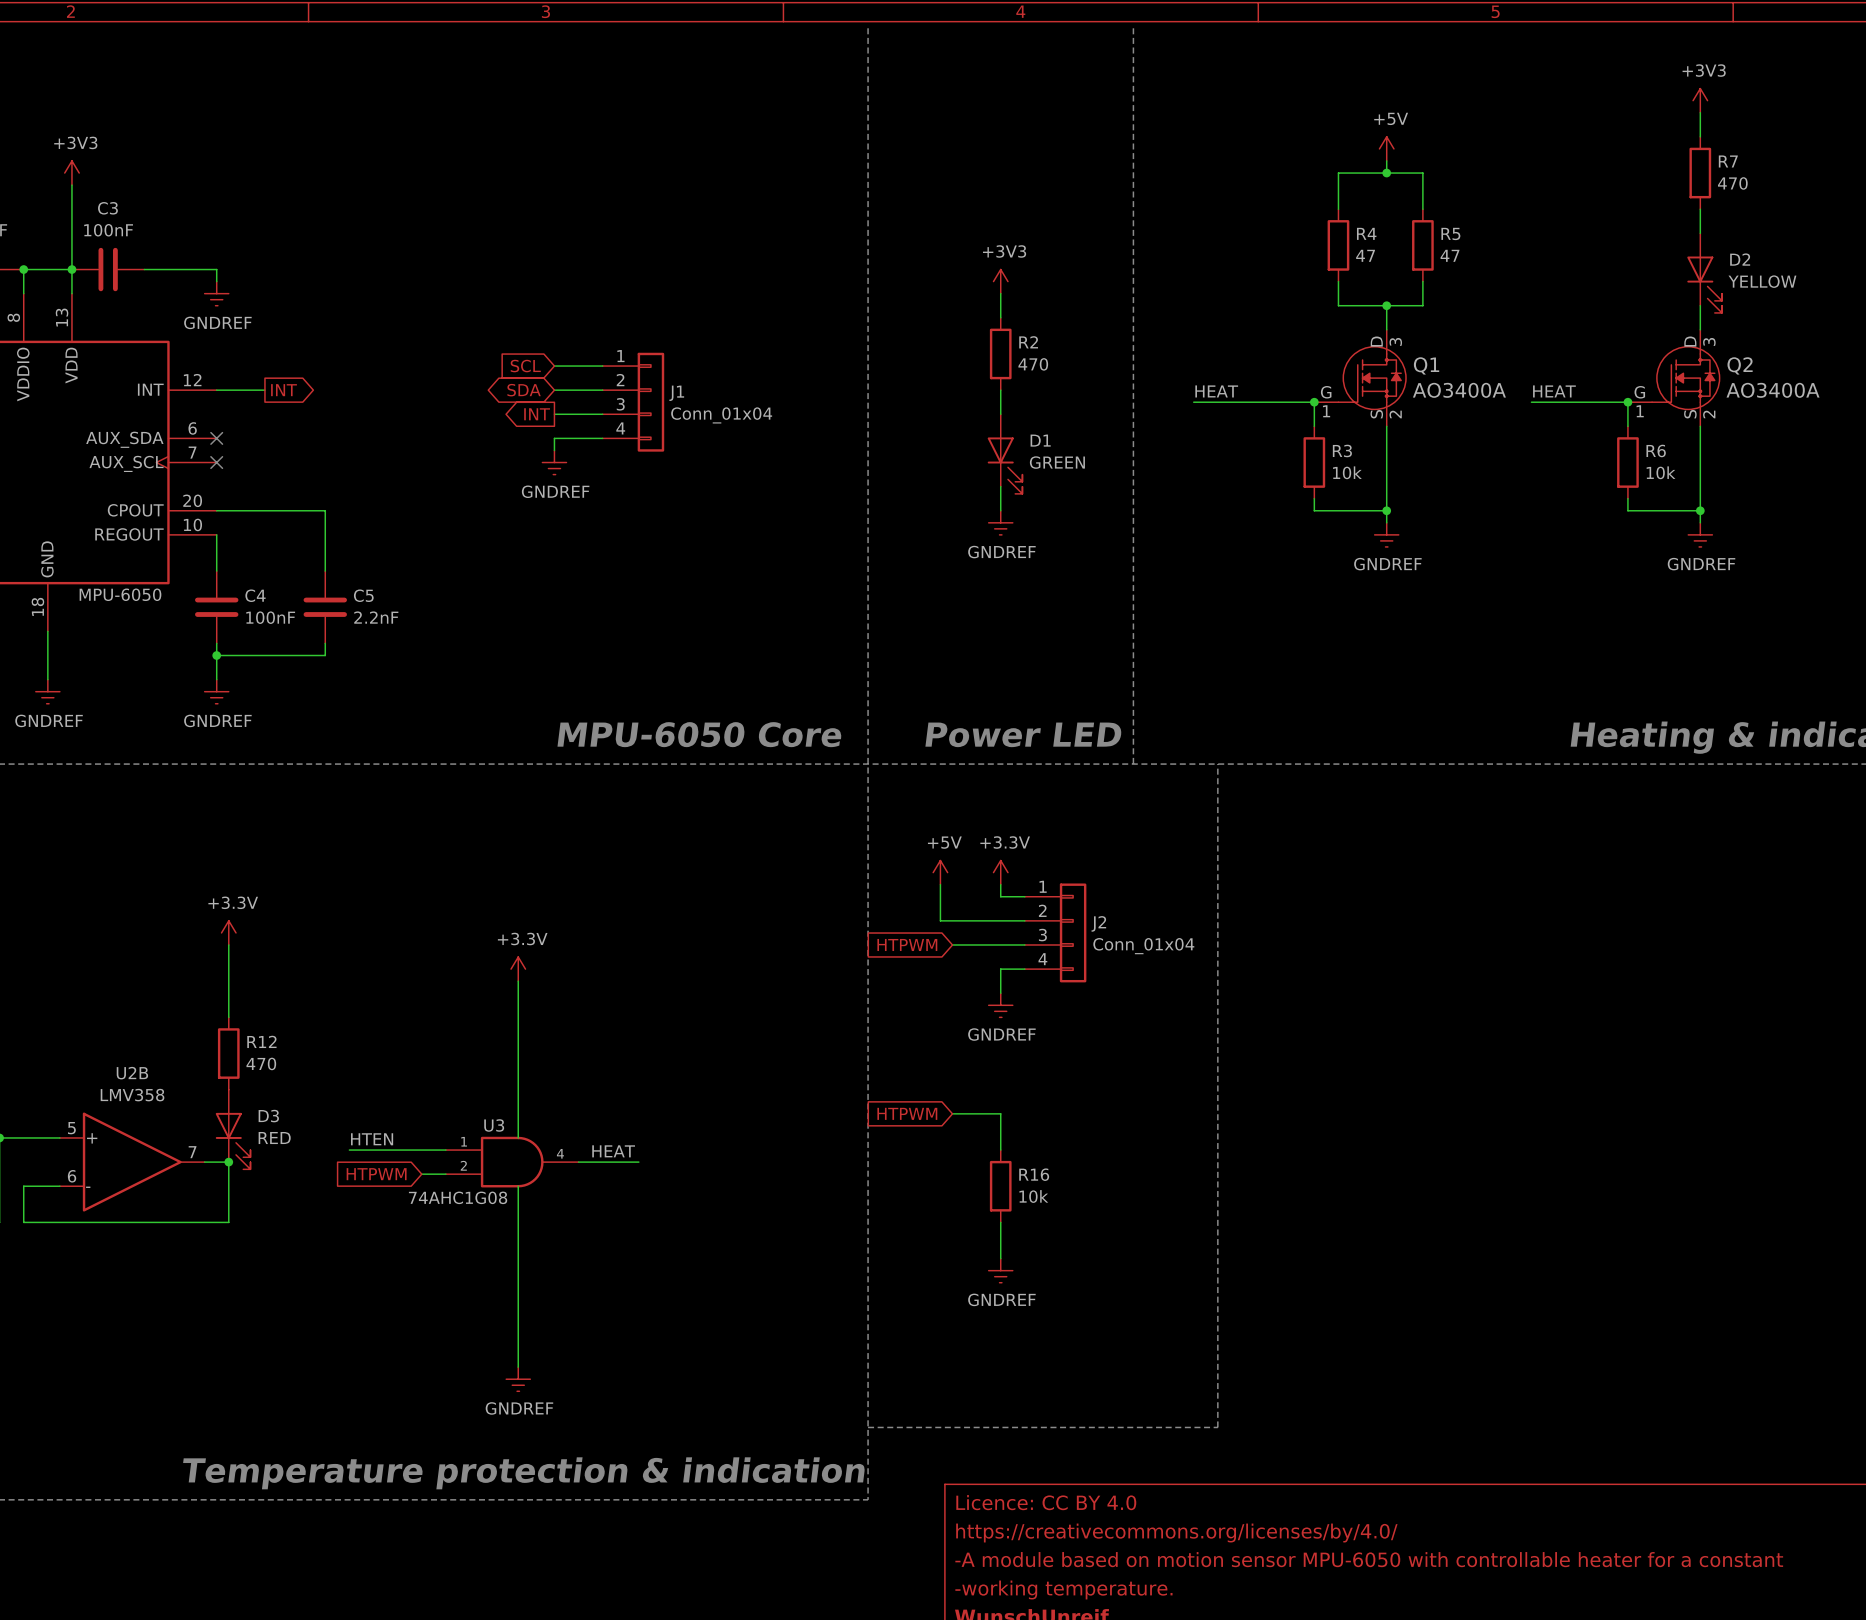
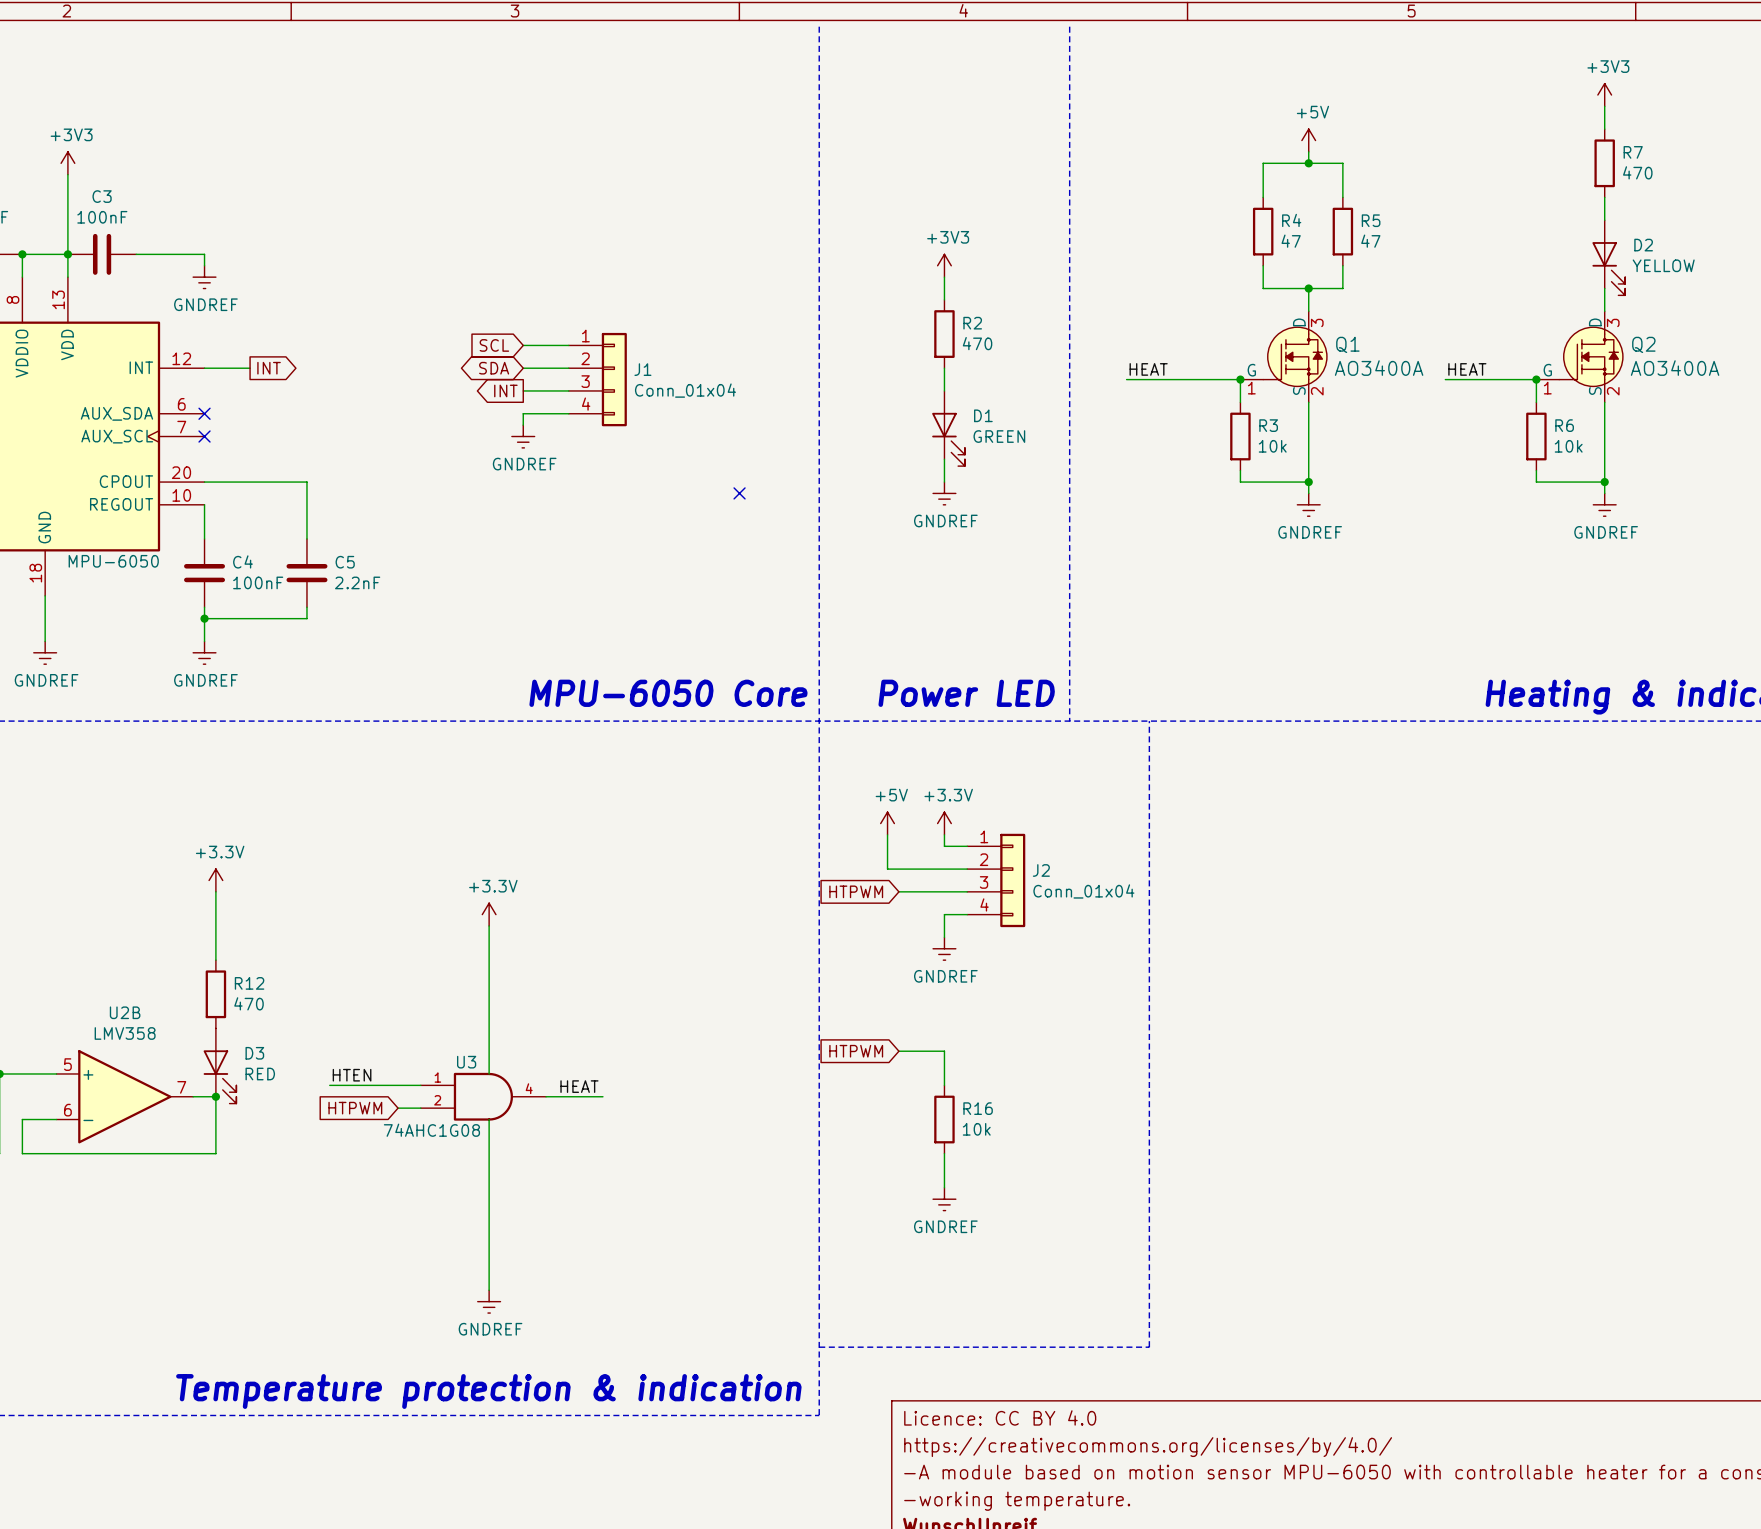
no-connect mark: none -> (739, 493)

